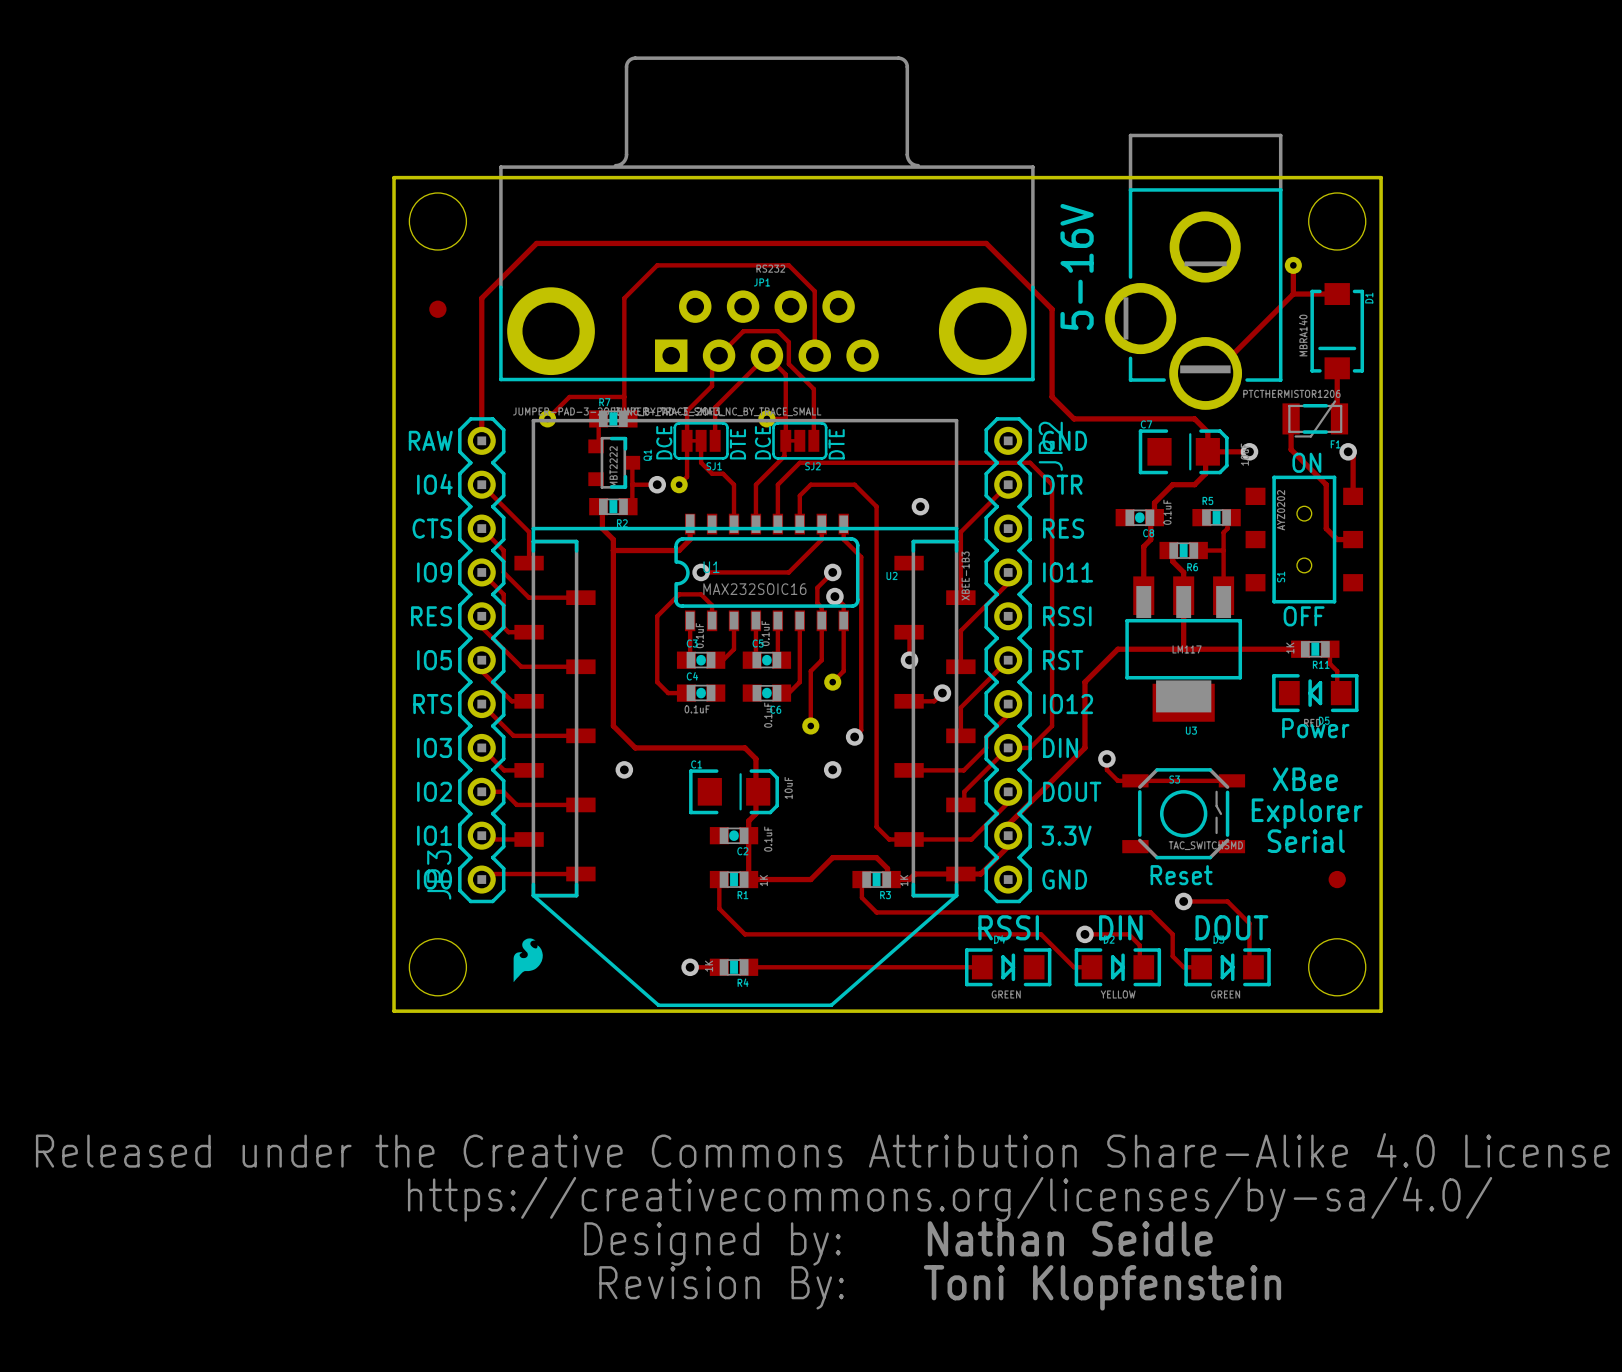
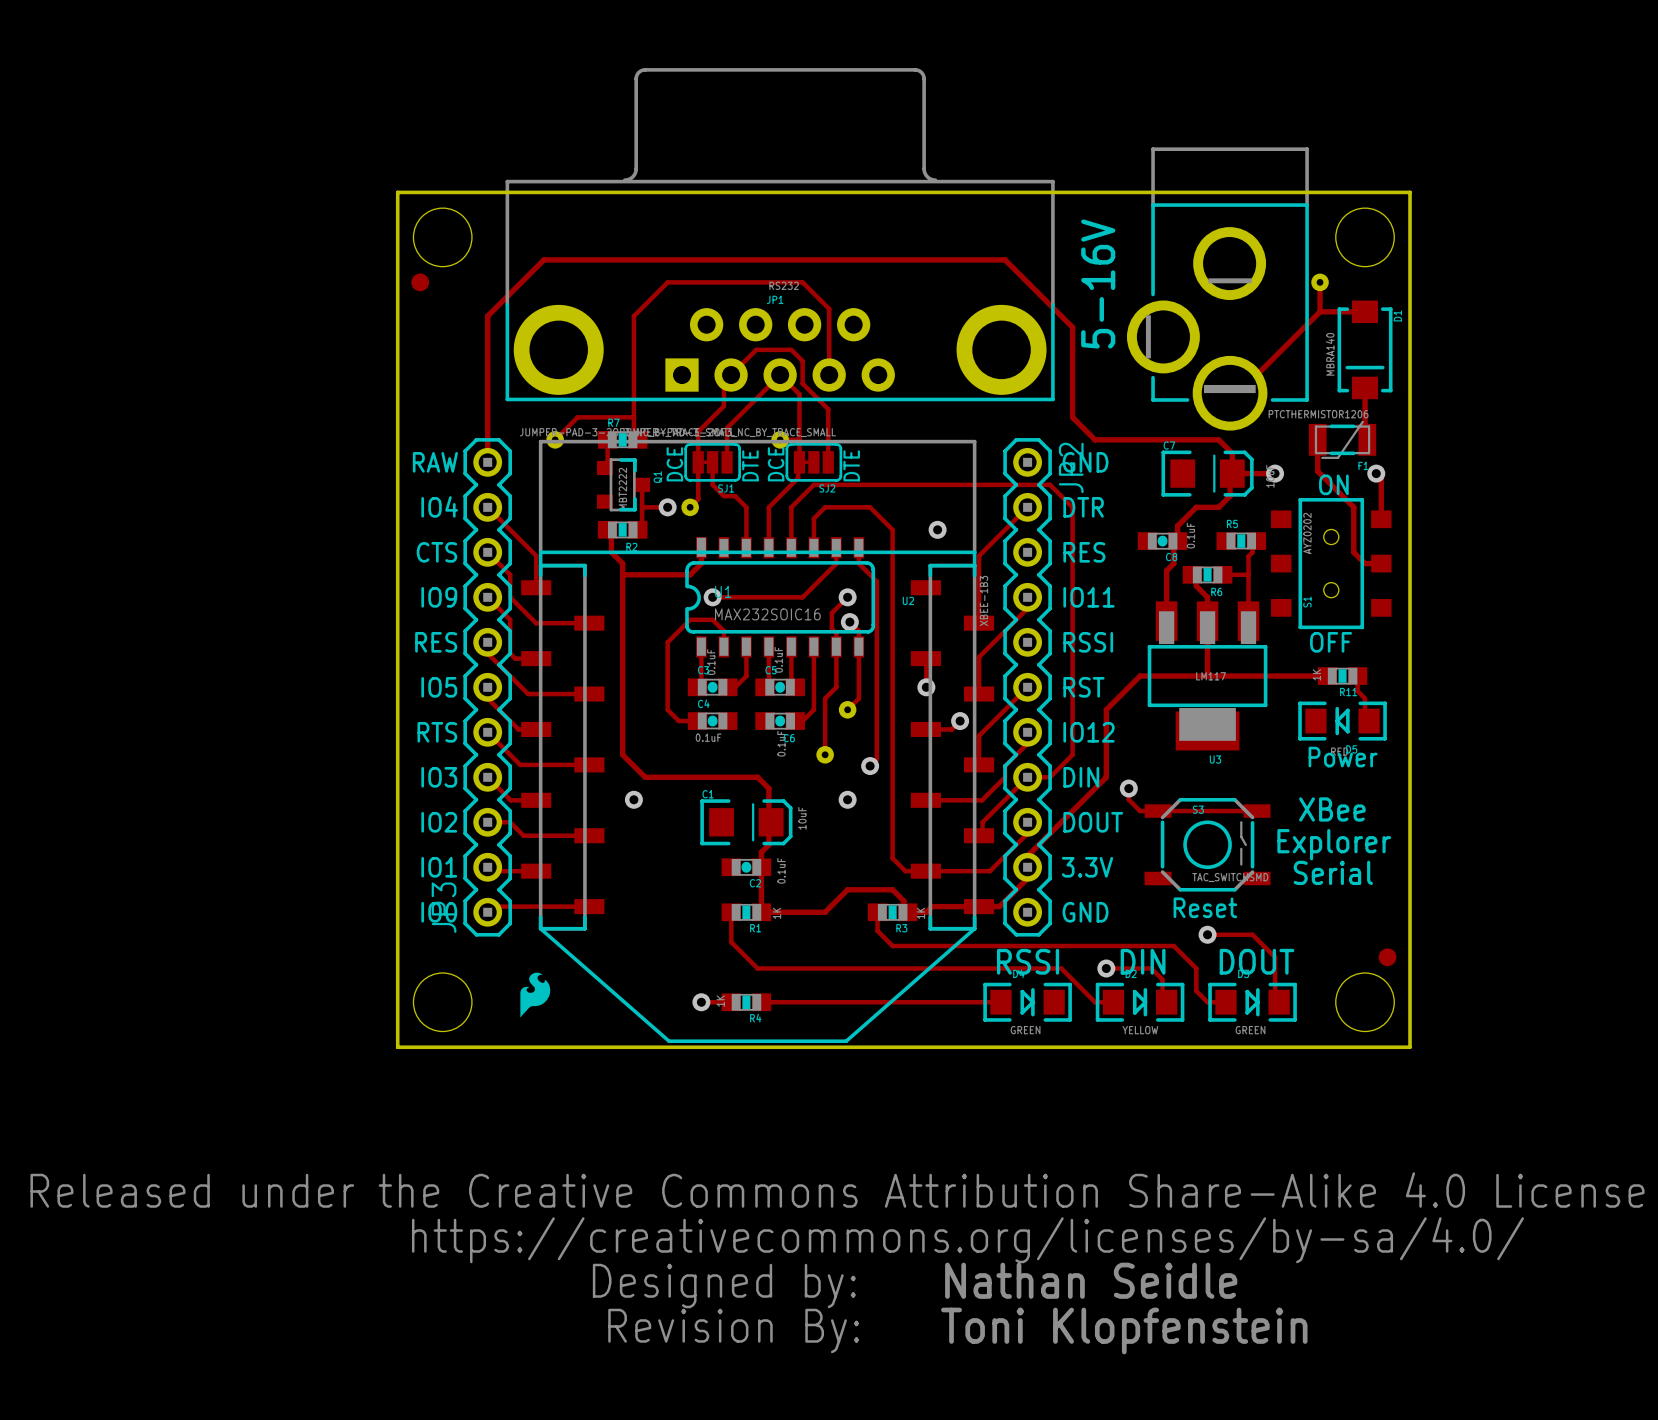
part position: (437, 309) -> (420, 282)
part position: (1337, 879) -> (1387, 957)

